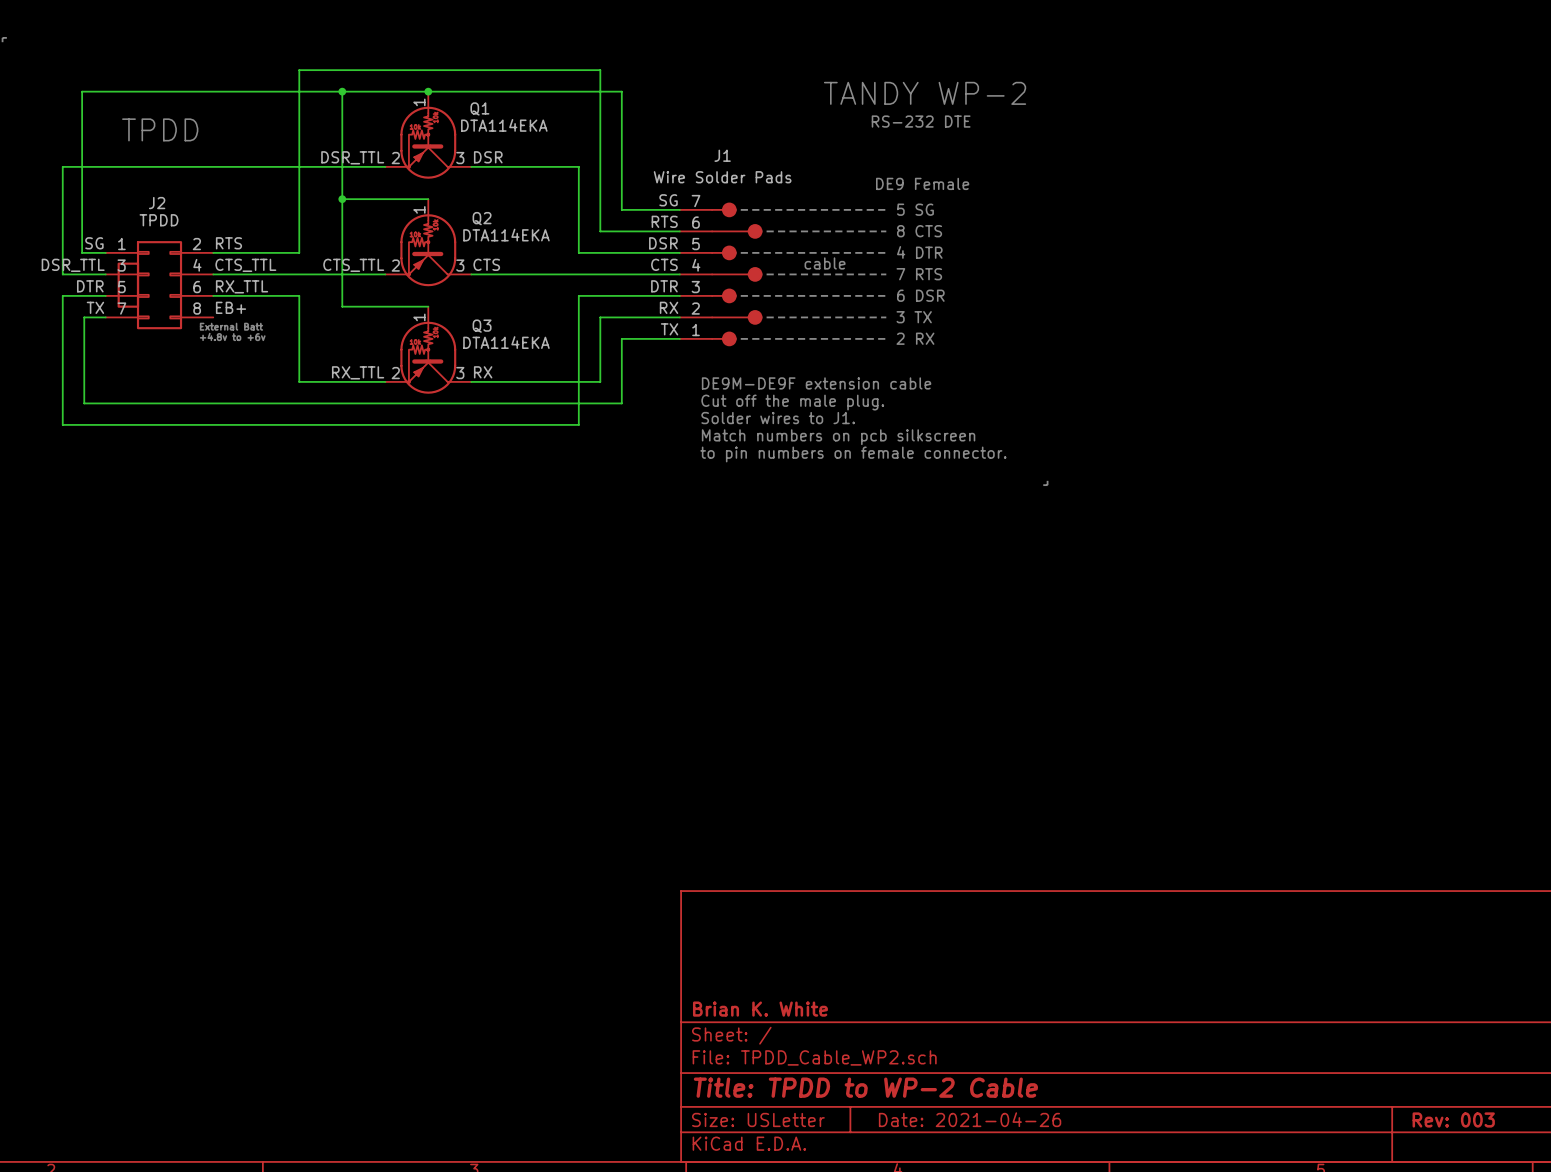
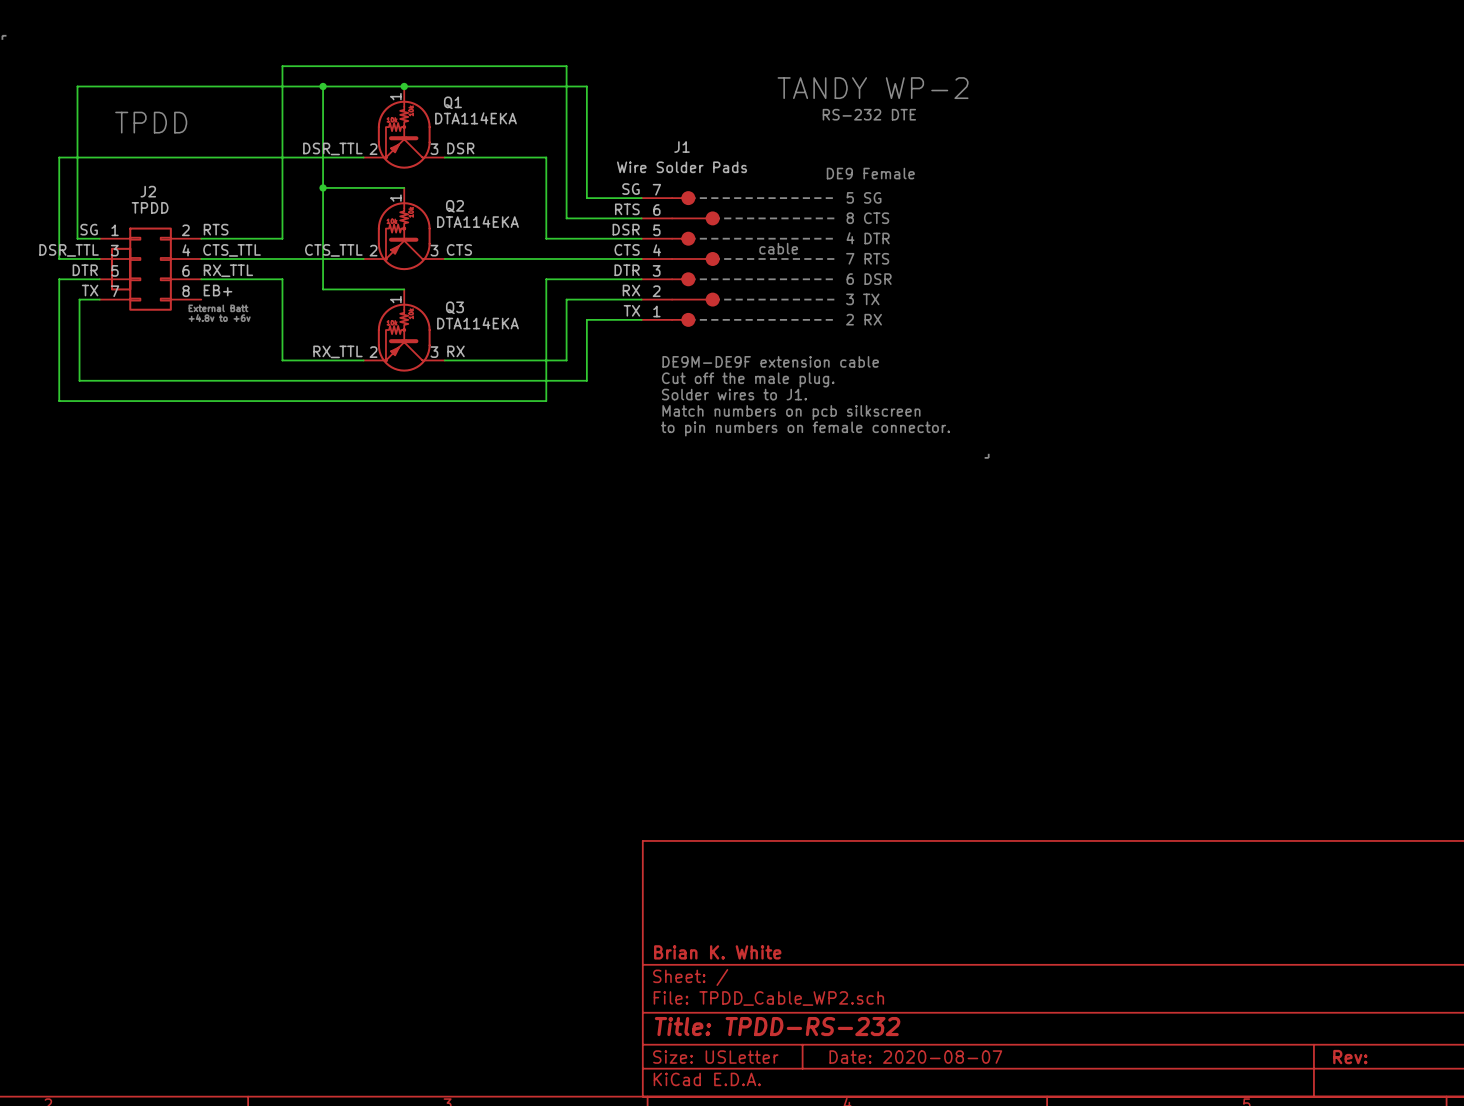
title block: Title: TPDD to WP-2 Cable (865, 1087) -> Title: TPDD-RS-232 (777, 1026)
title block: Date: 2021-04-26 (970, 1119) -> Date: 2020-08-07 (915, 1057)
title block: Rev: 003 (1453, 1119) -> Rev: (1350, 1057)

